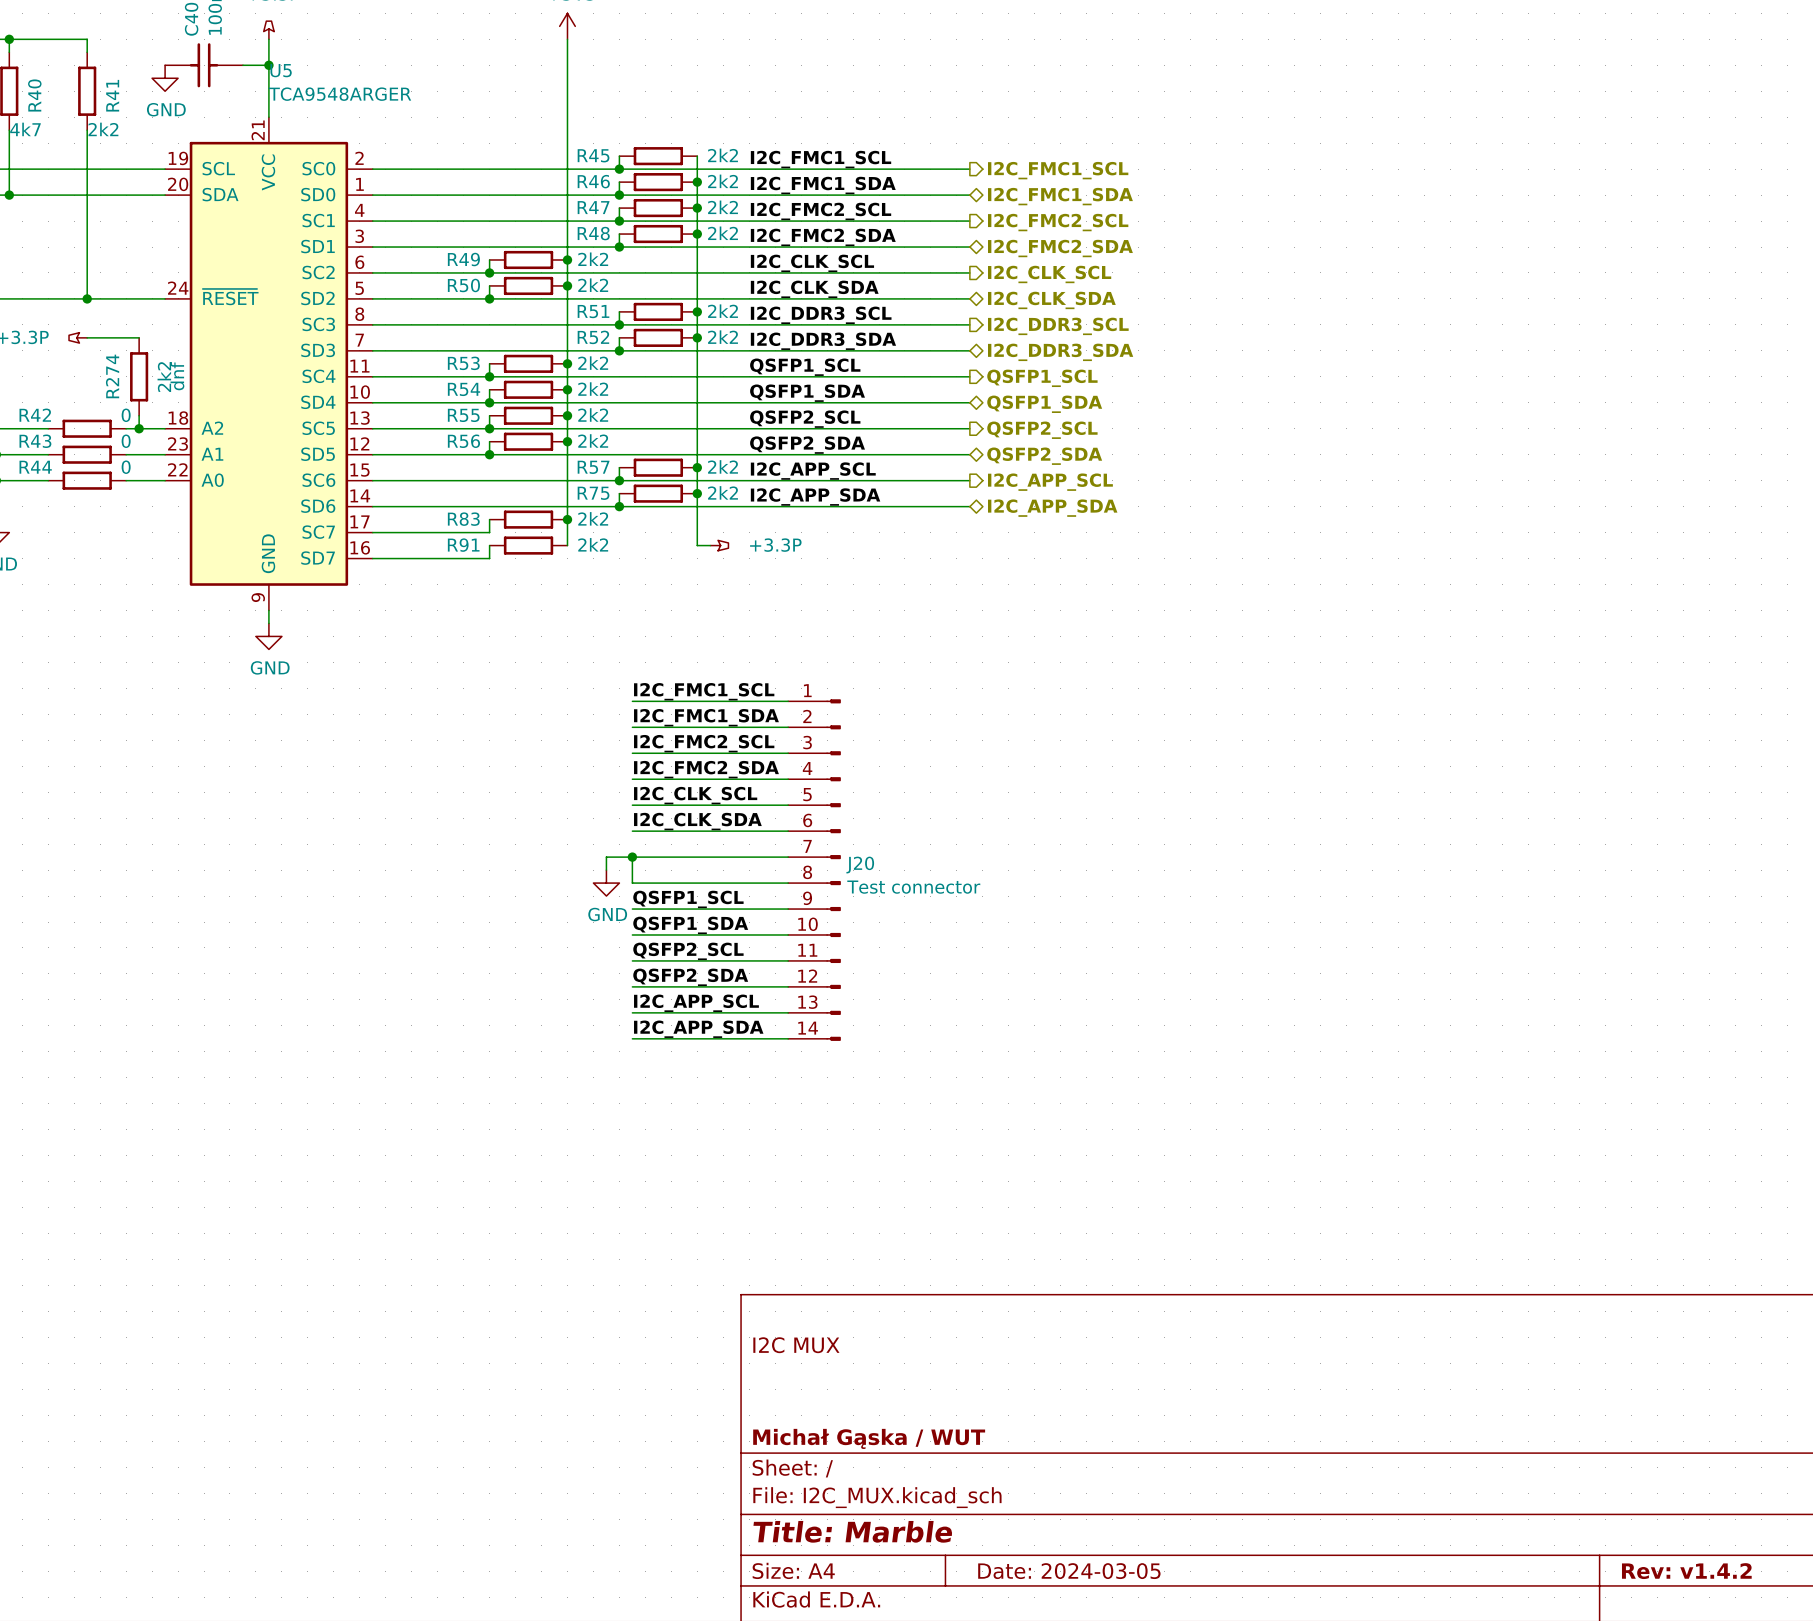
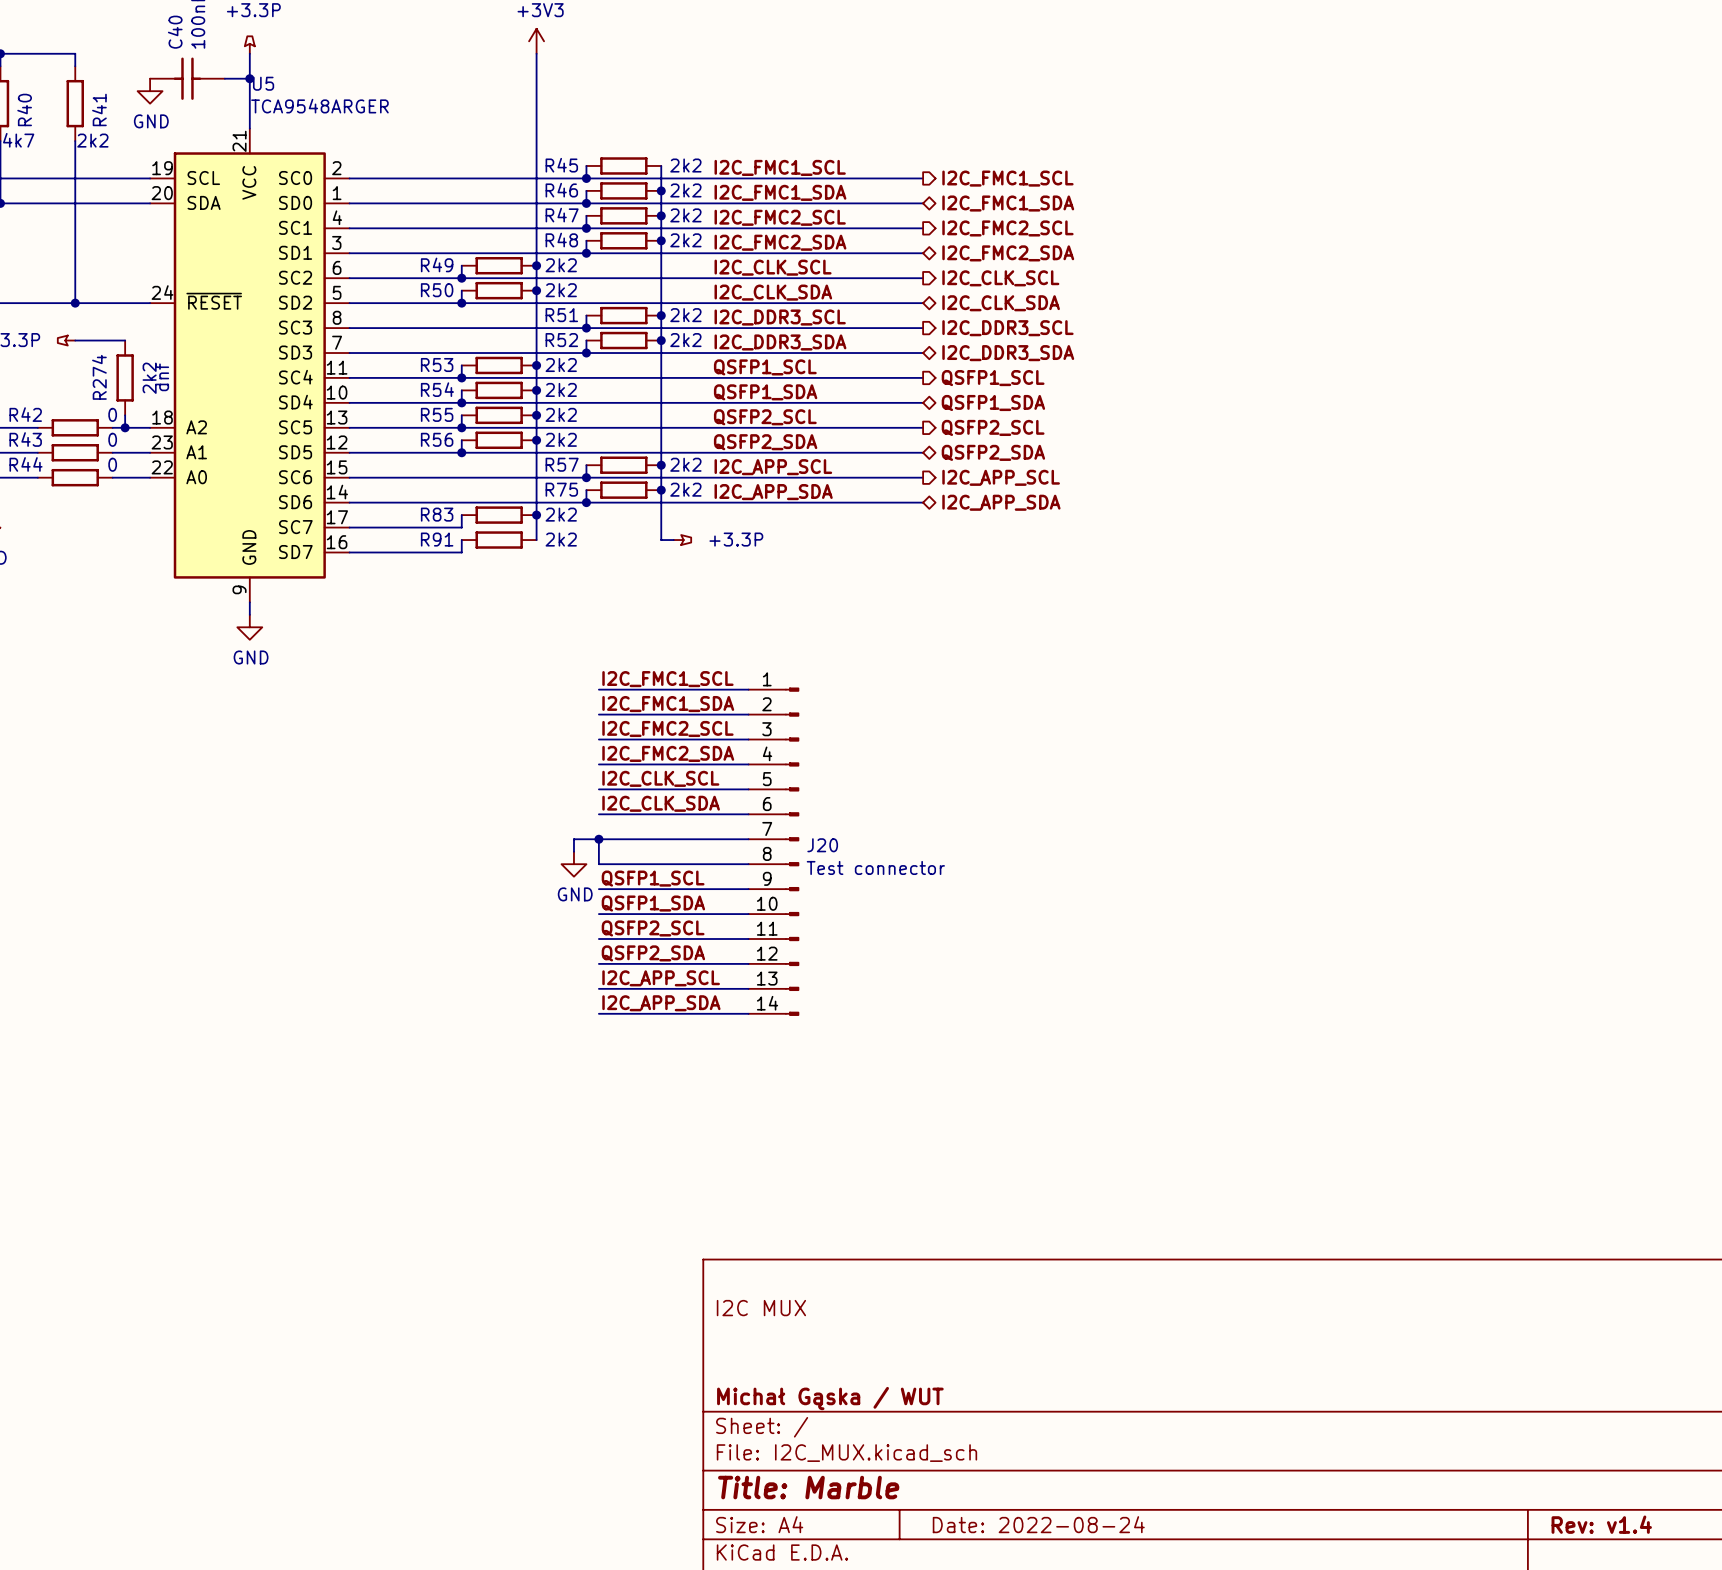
title block: Date: 2024-03-05 (1069, 1571) -> Date: 2022-08-24 (1038, 1524)
title block: Rev: v1.4.2 (1686, 1571) -> Rev: v1.4 (1601, 1524)

